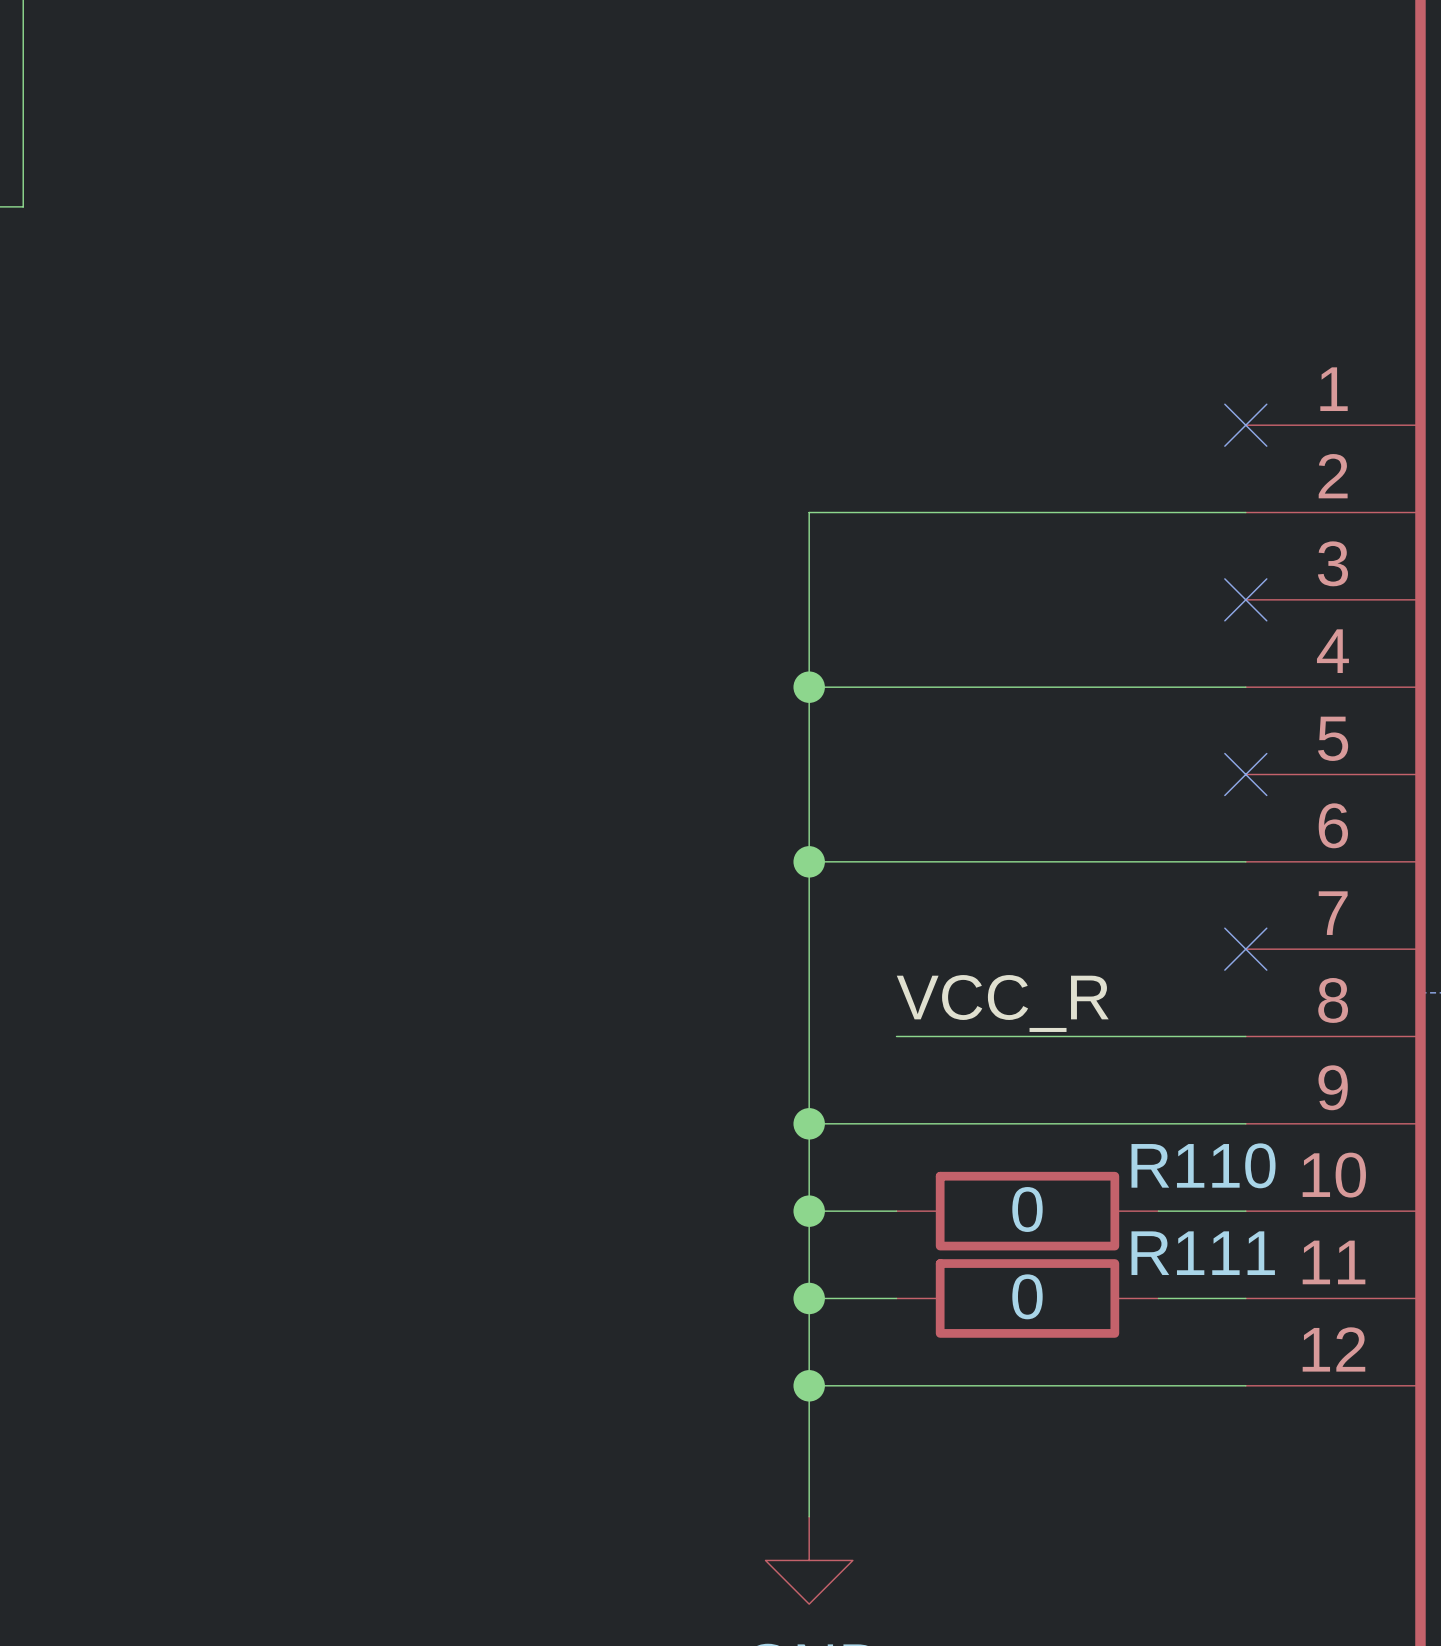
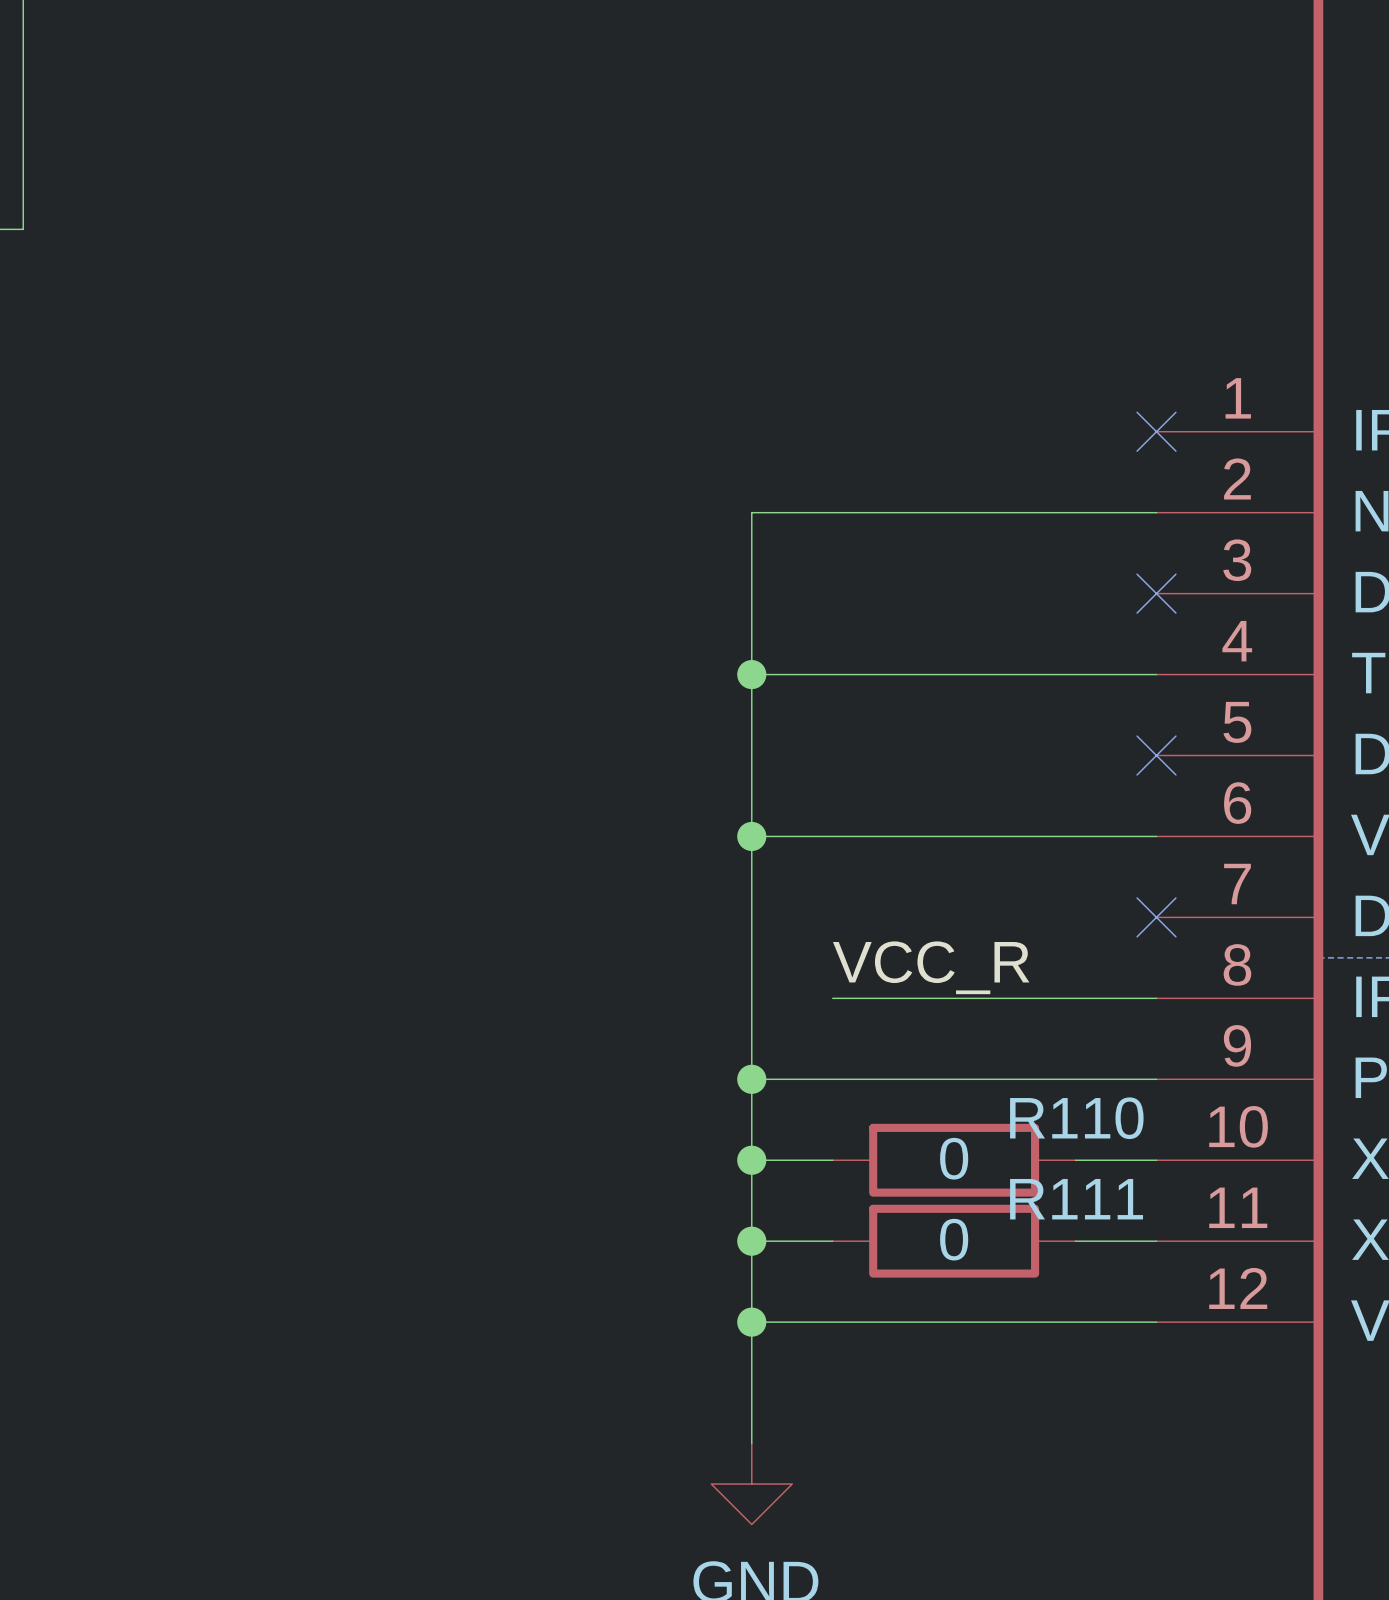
R110 name position: R110 (1203, 1165) -> R110 (1076, 1118)
R111 name position: R111 (1203, 1253) -> R111 (1076, 1199)

